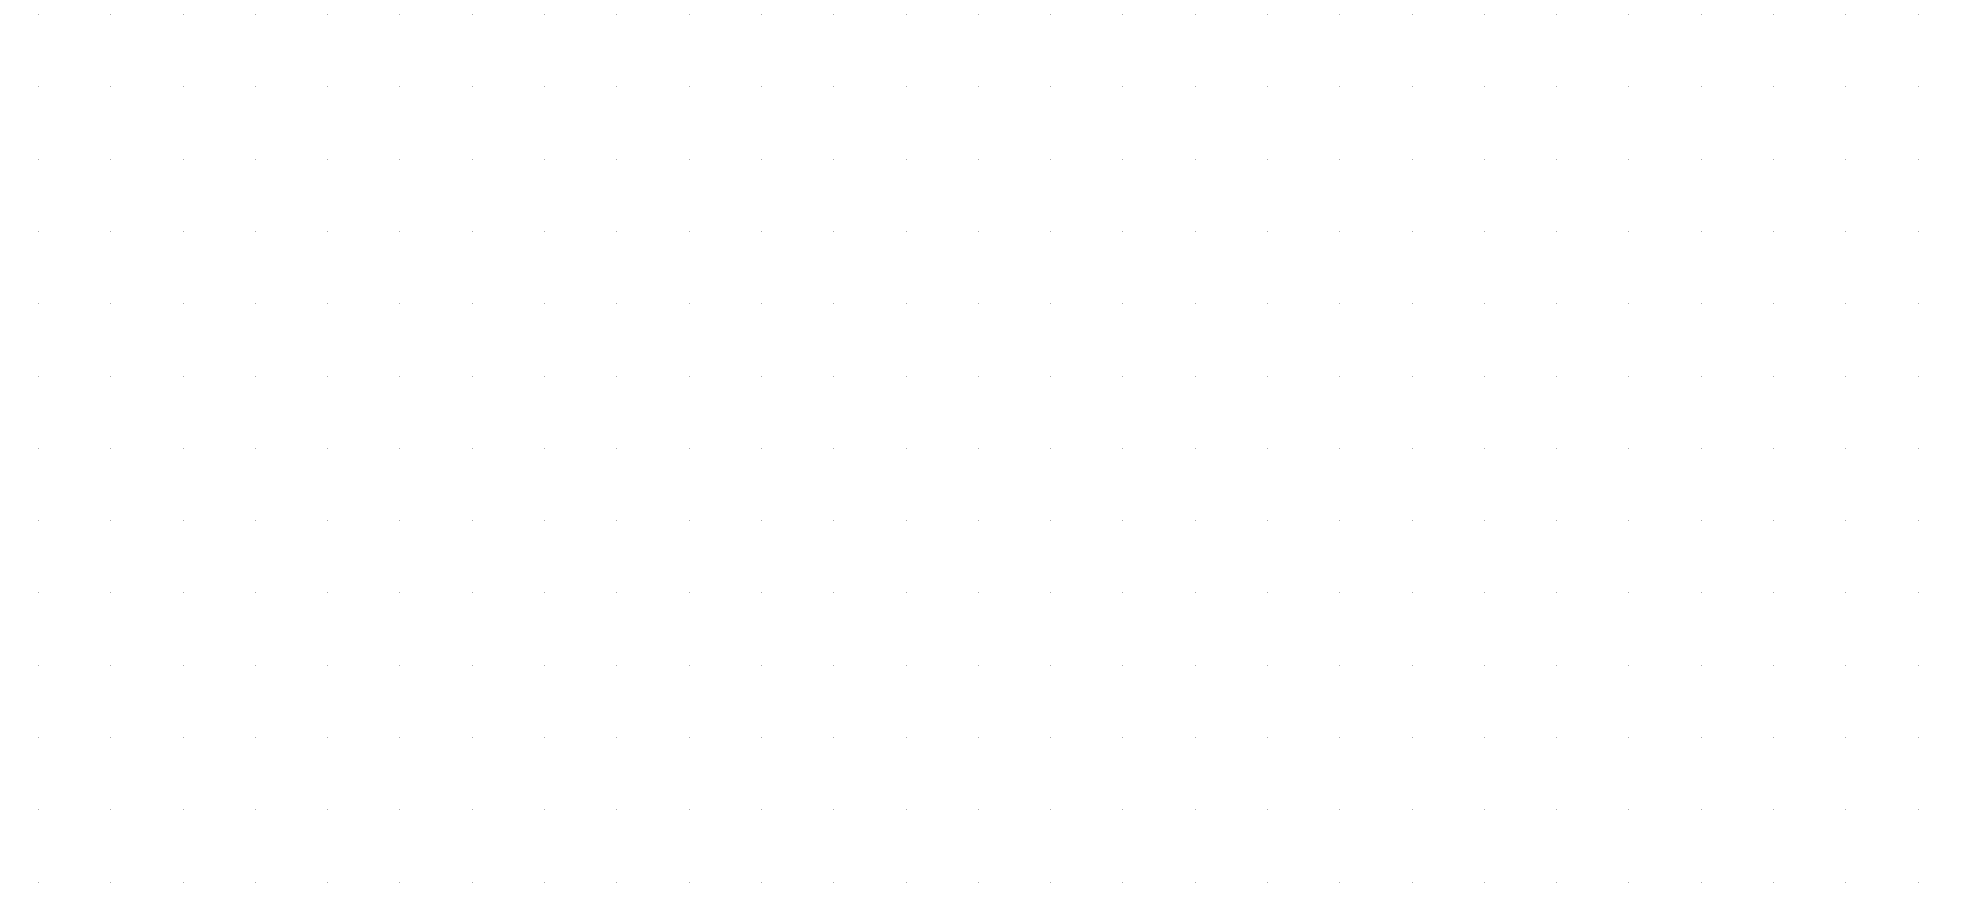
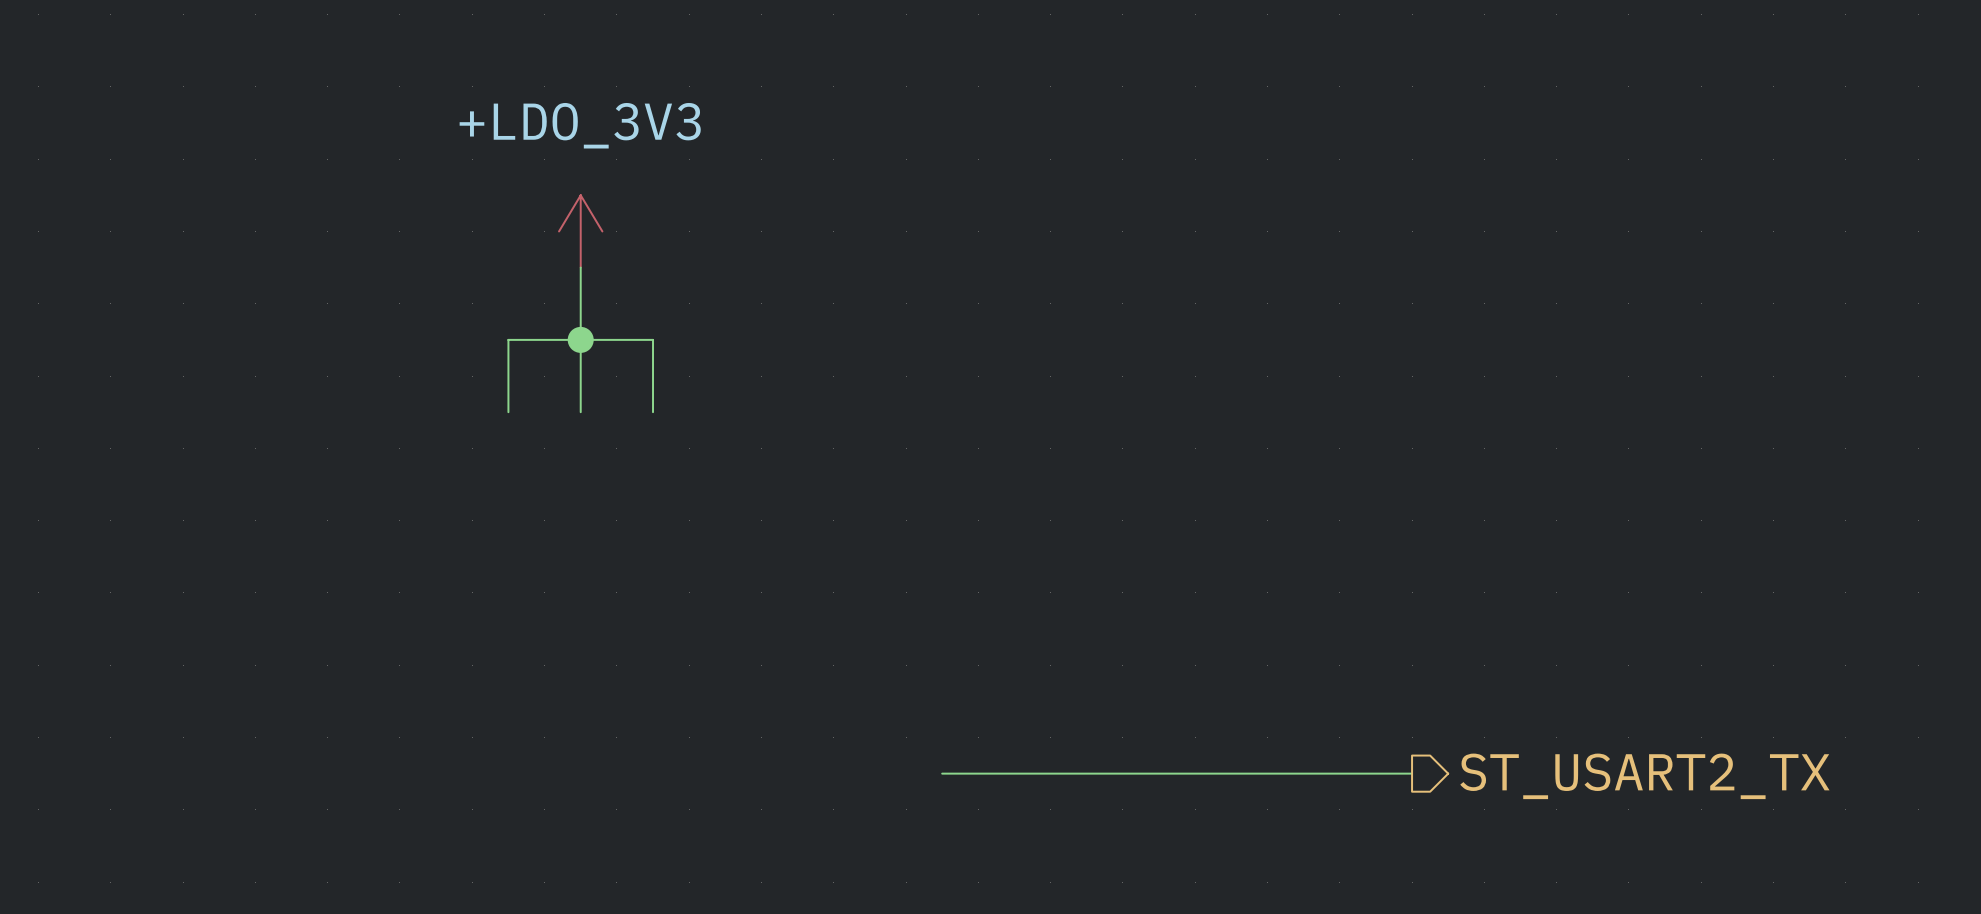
power symbol: none -> +LDO_3V3 (580, 231)
wire: none -> (580, 267) (580, 412)
junction: none -> (580, 339)
wire: none -> (508, 412) (508, 339) (653, 339) (653, 412)
hierarchical label: none -> ST_USART2_TX (1644, 776)
wire: none -> (942, 773) (1412, 773)

